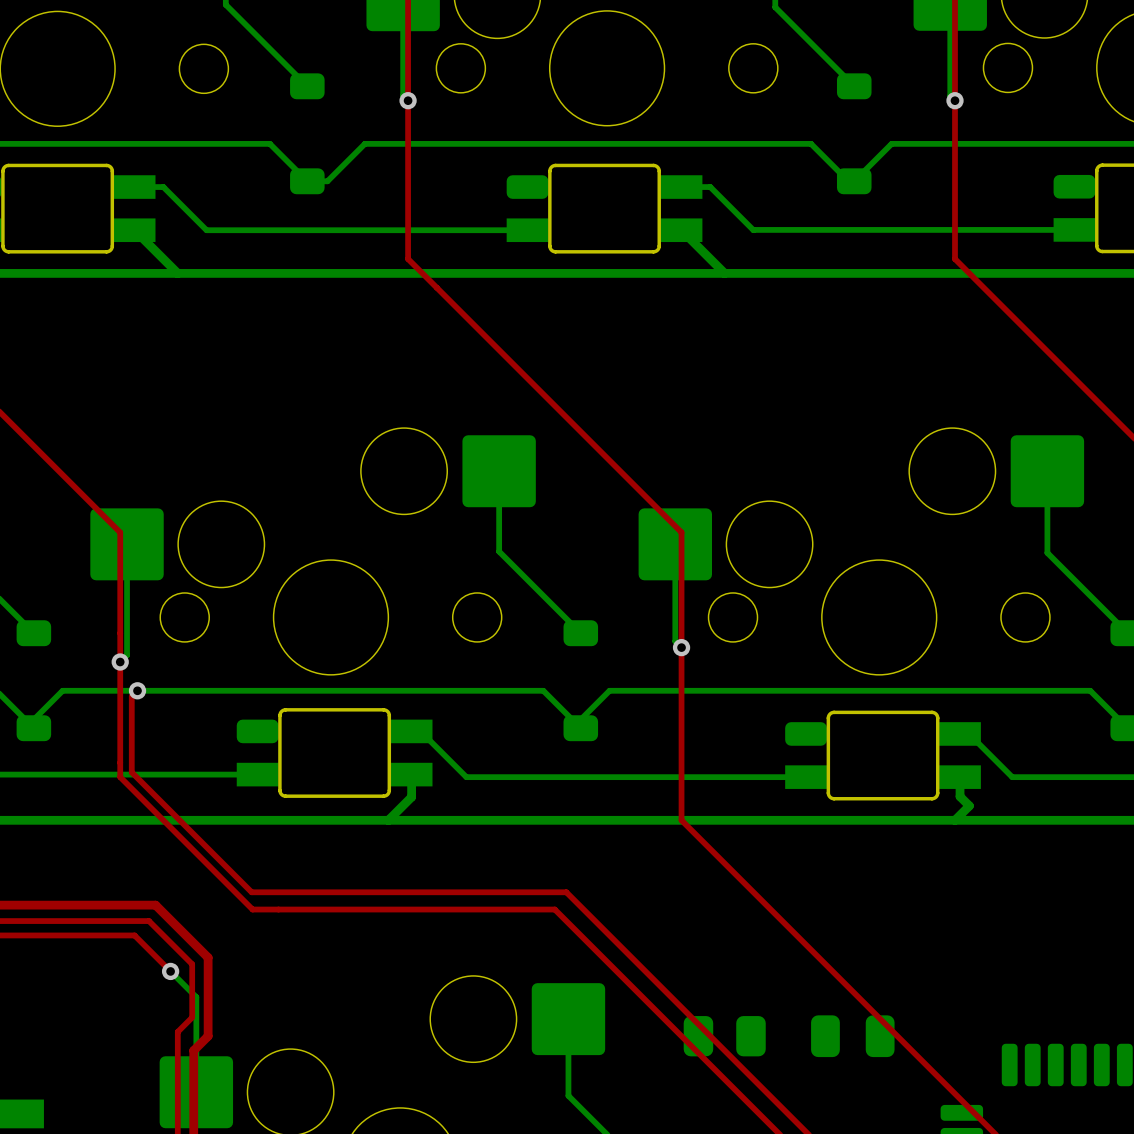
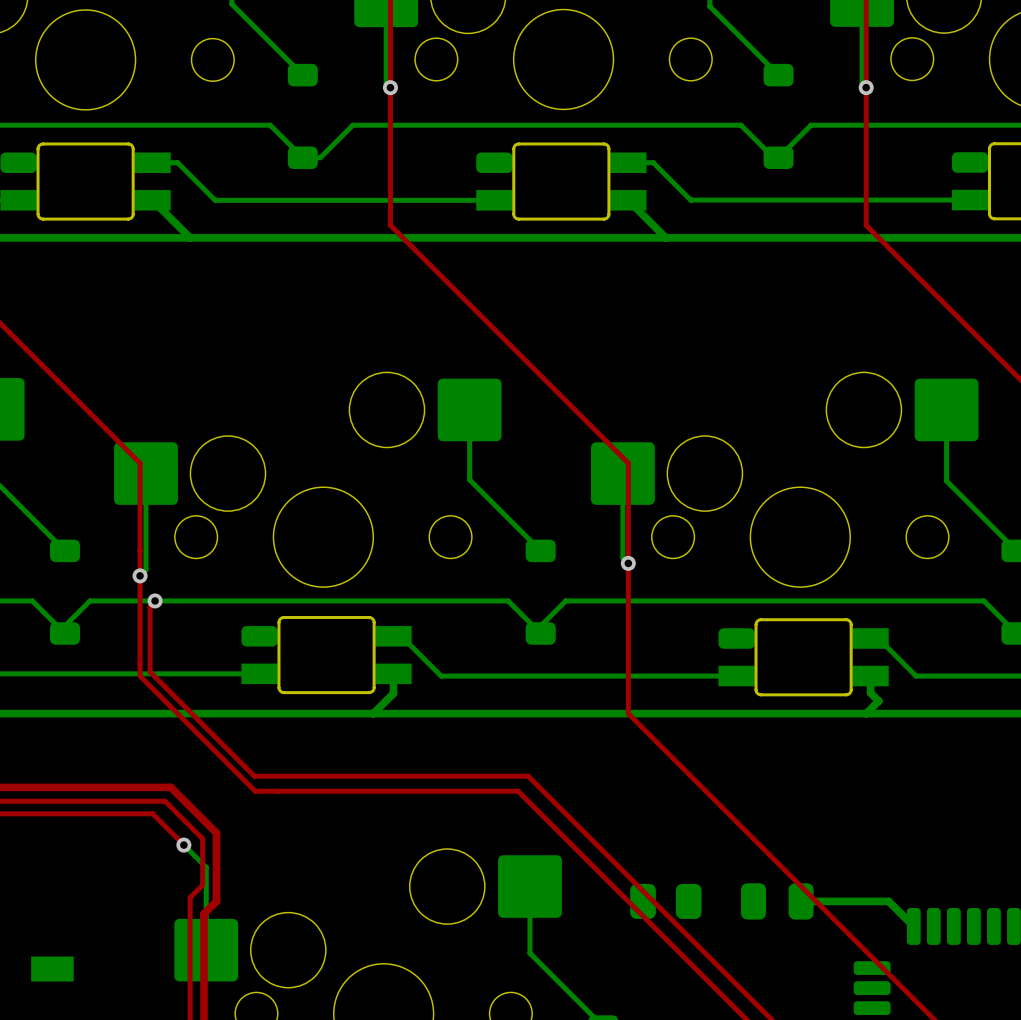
bottom track: none -> (801, 901) (888, 901) (913, 926)

